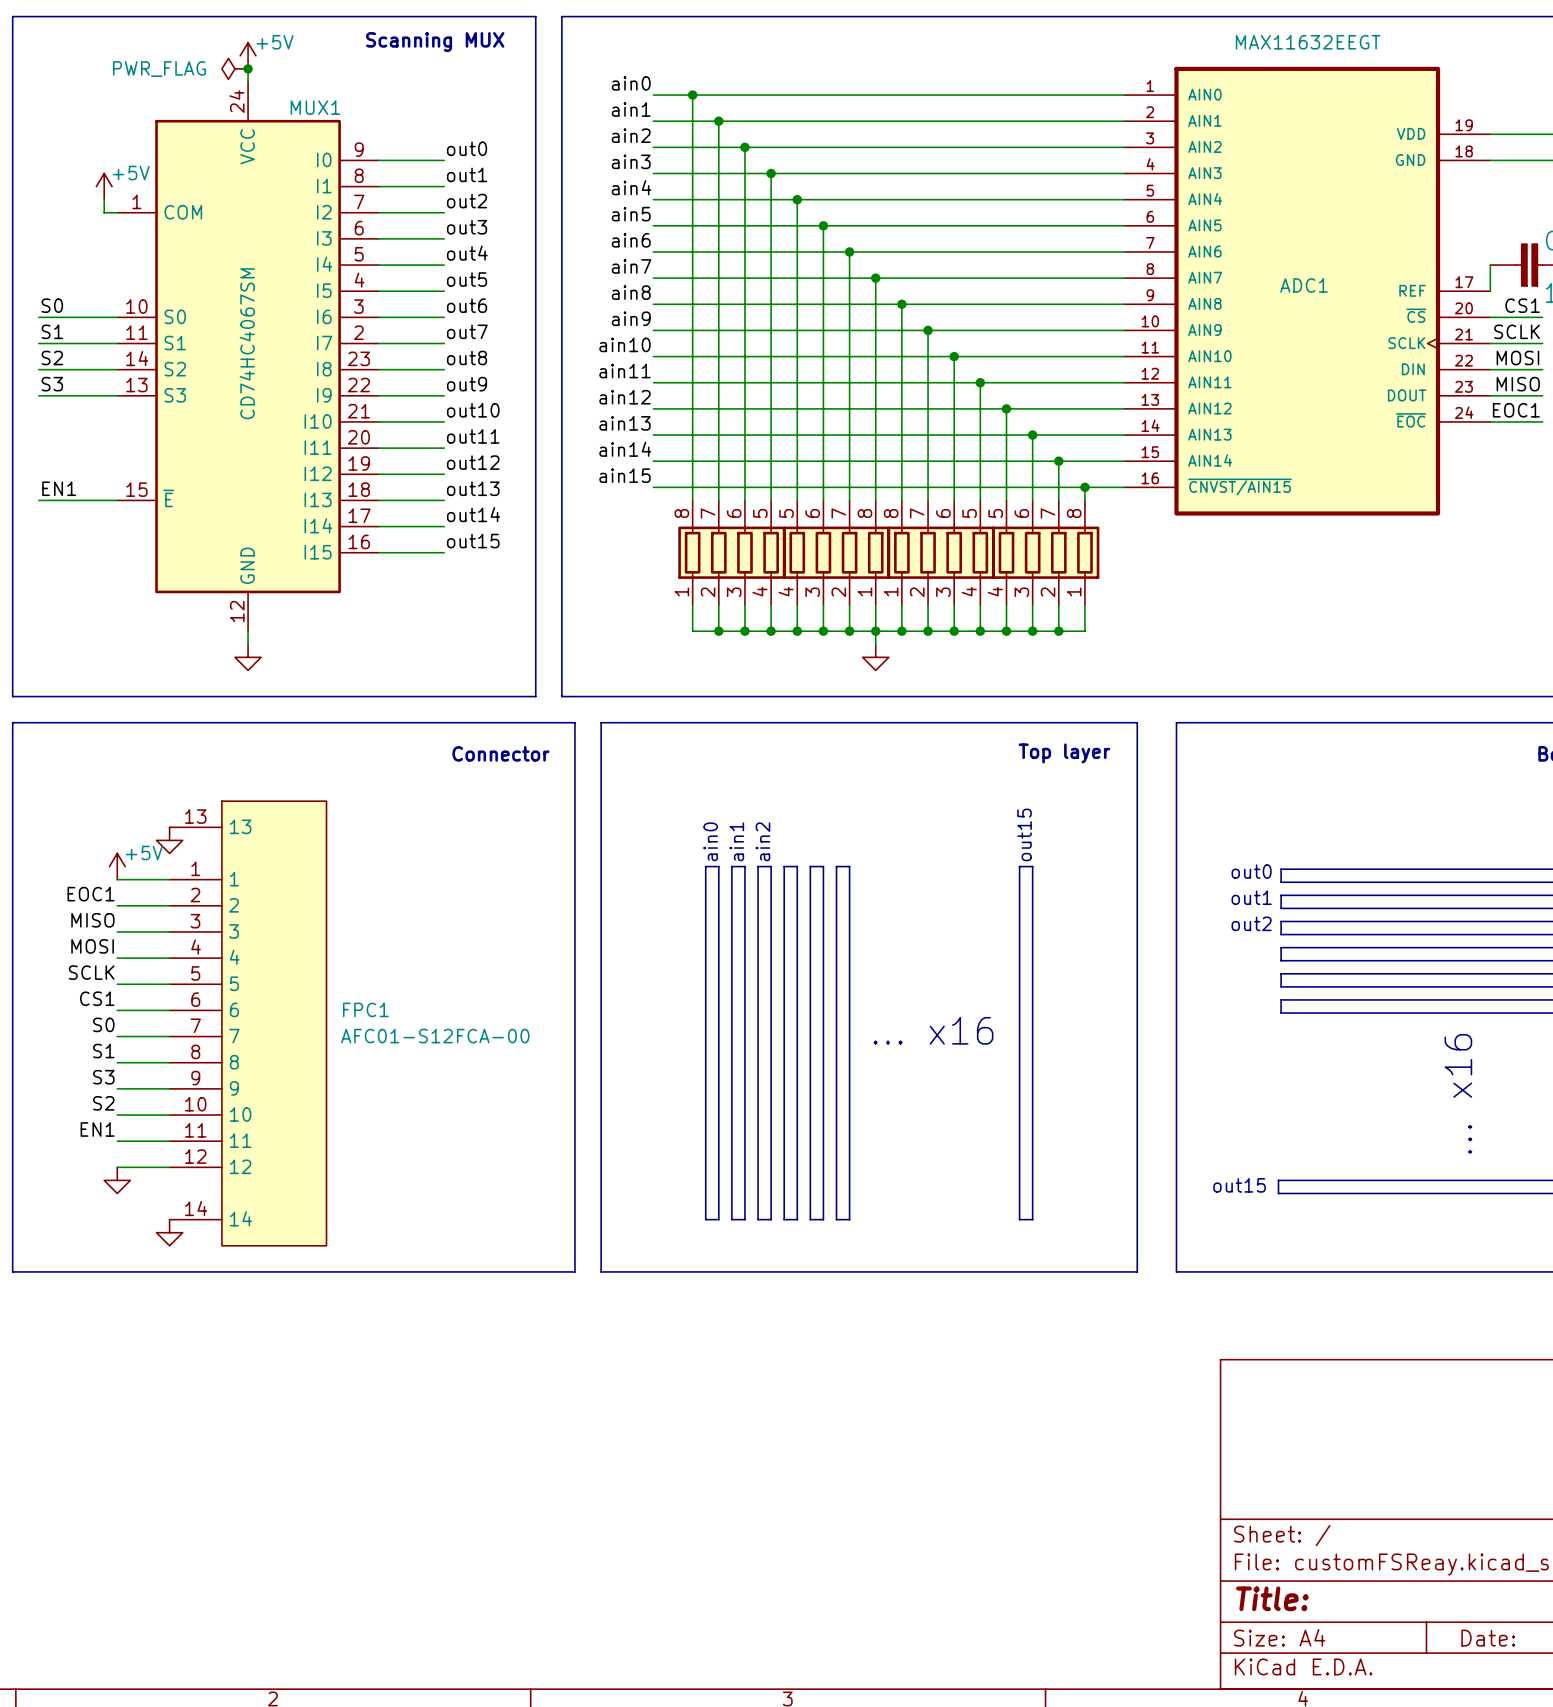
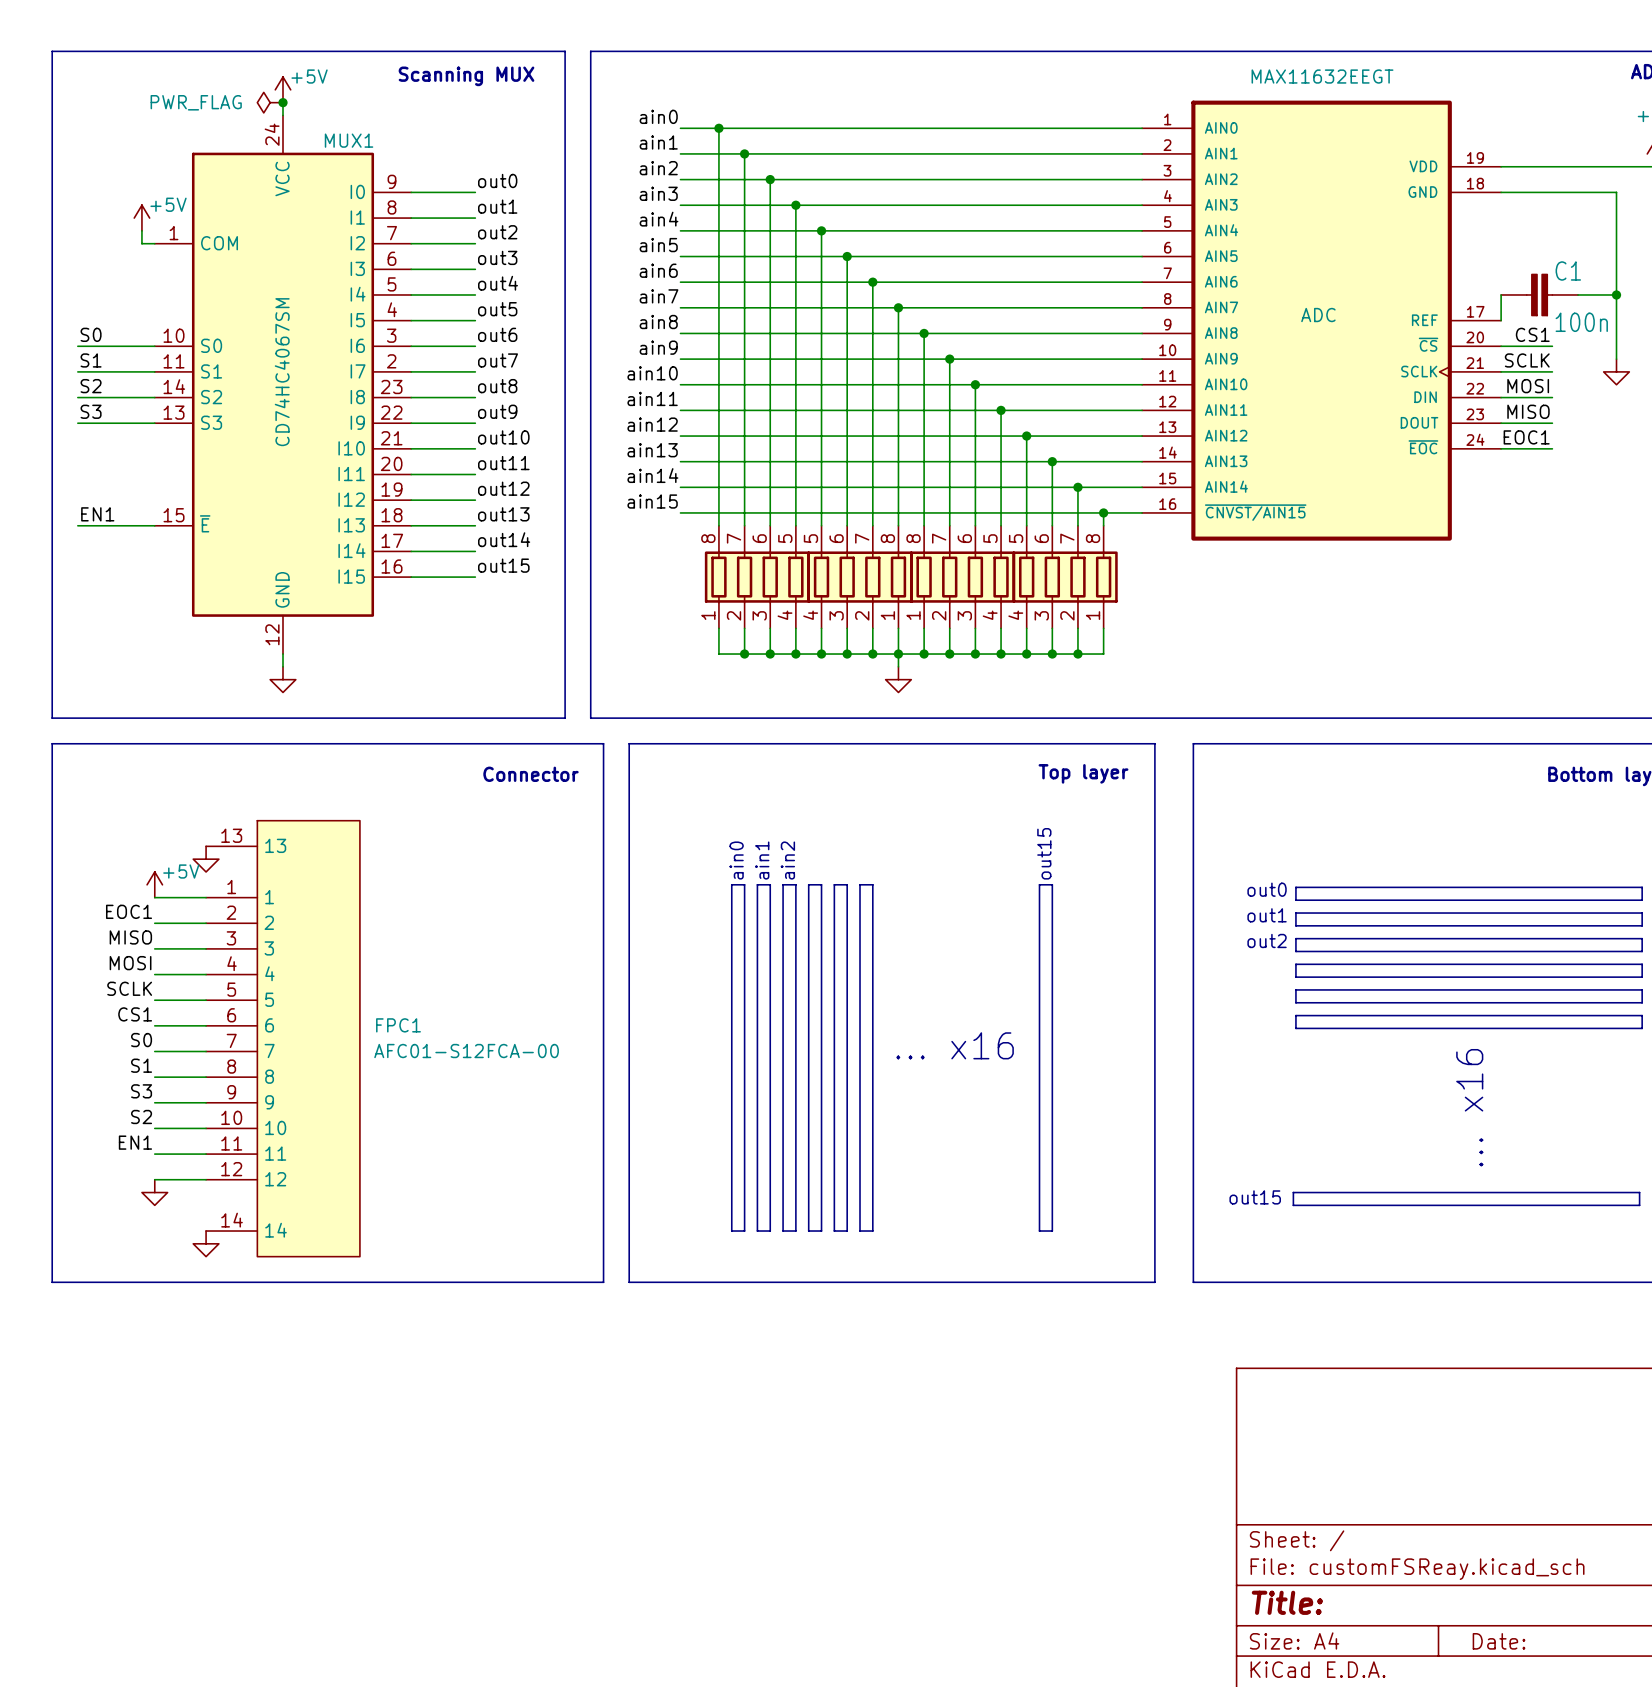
ADC1 name: ADC1 (1304, 285) -> ADC (1318, 315)

